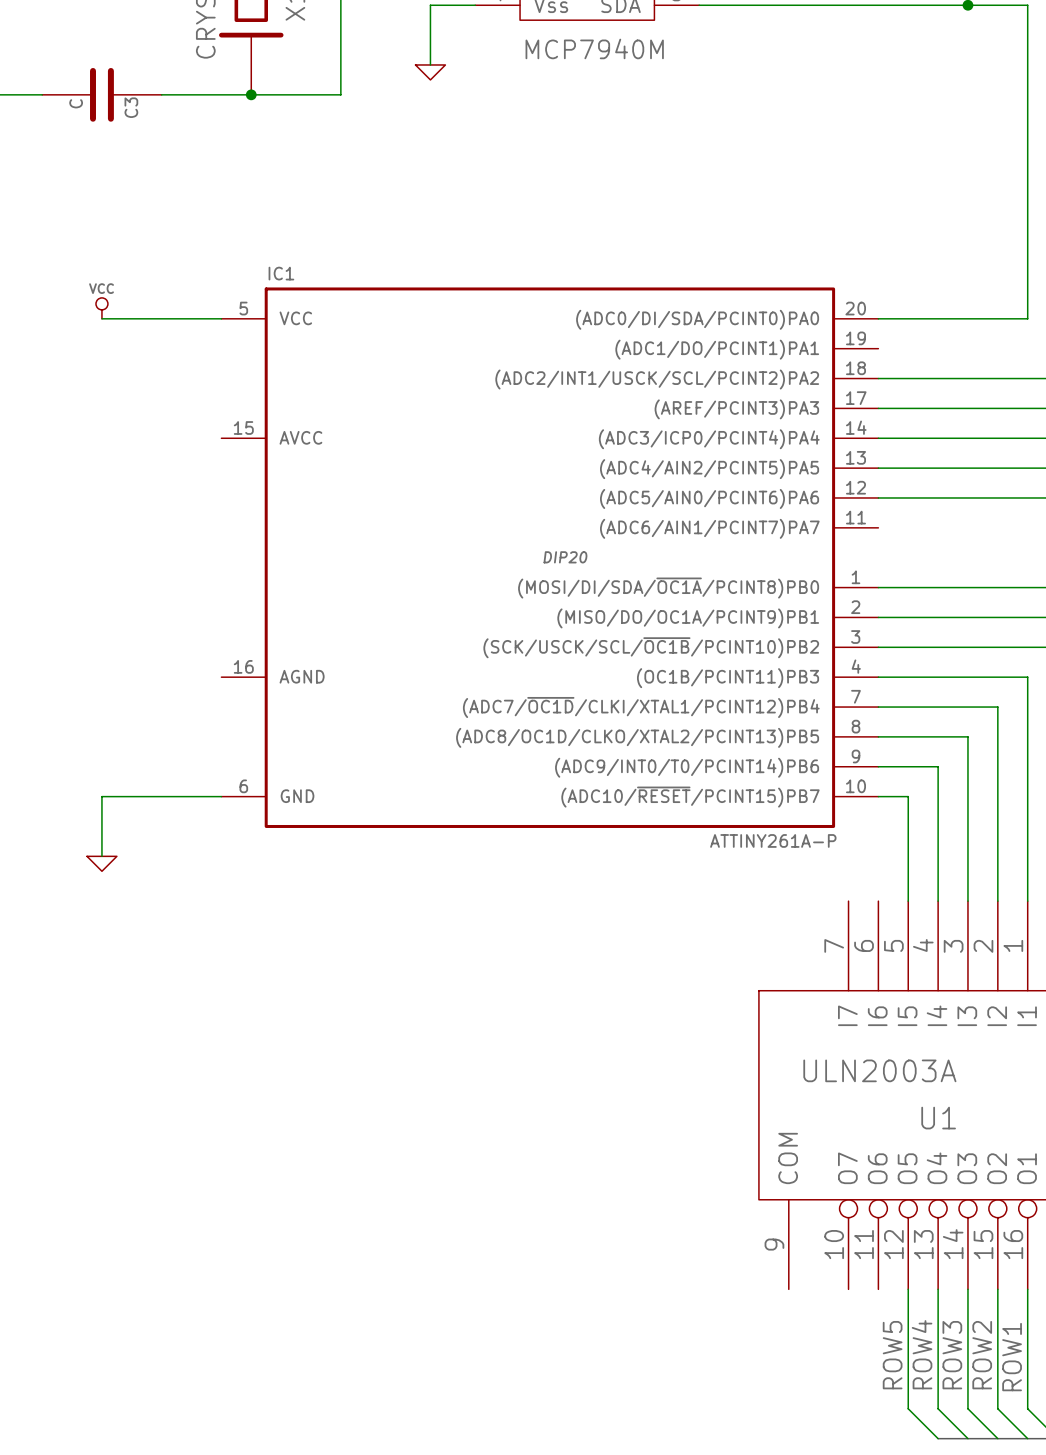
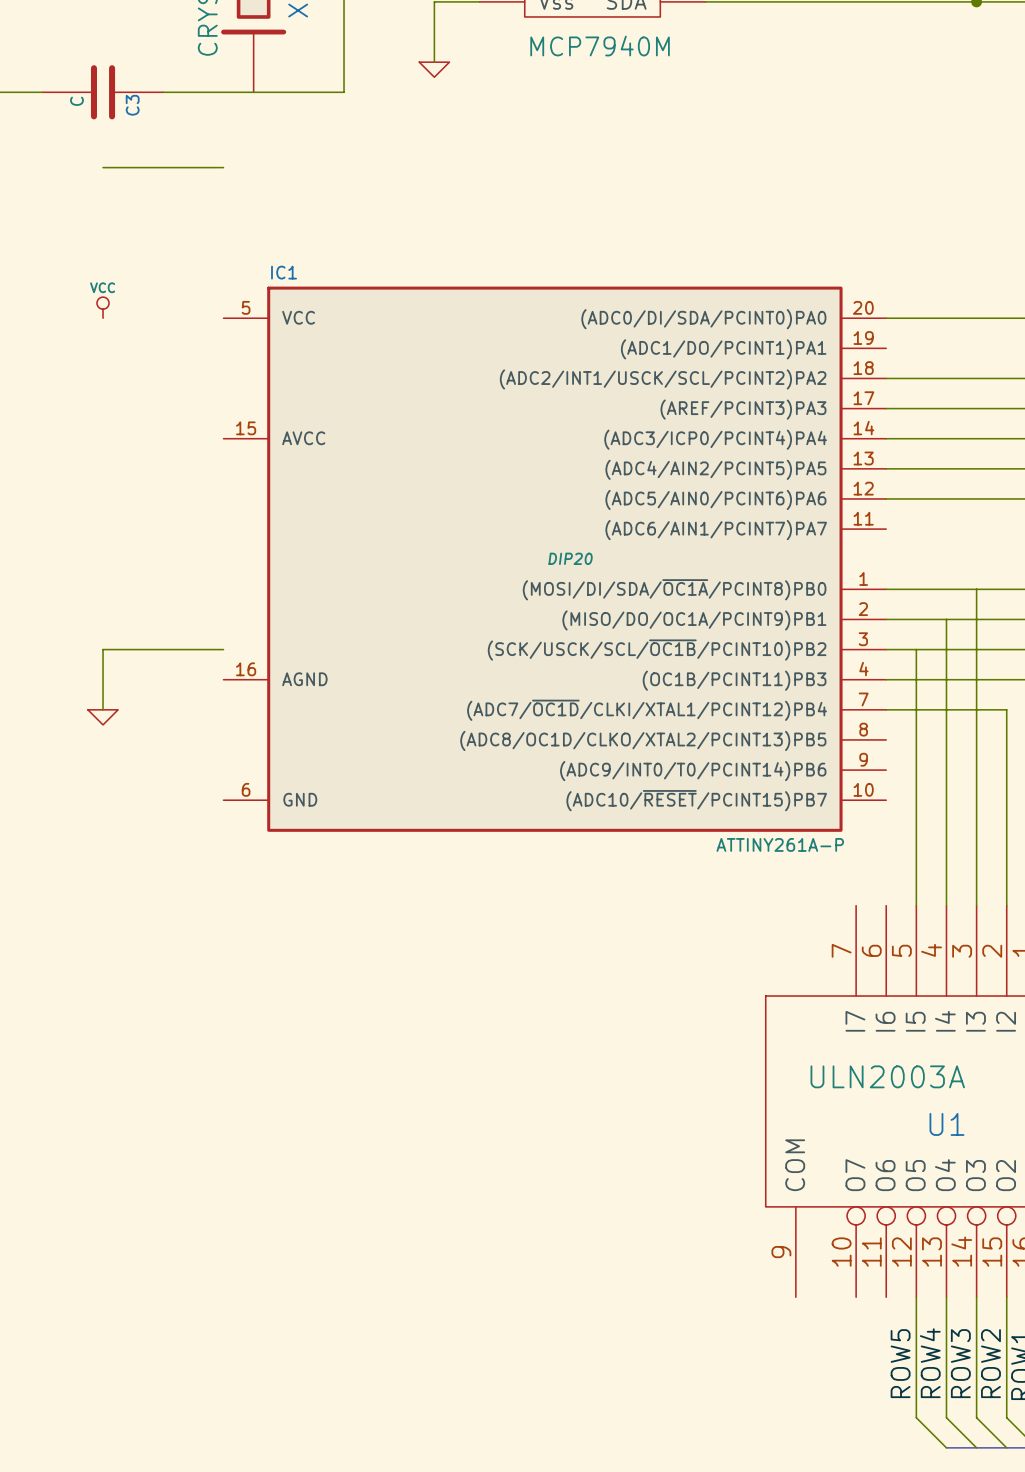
junction: (251, 94) -> none
wire: (101, 318) (221, 318) -> (103, 167) (223, 167)
wire: (878, 736) (967, 736) -> (976, 589) (976, 739)
wire: (878, 766) (938, 766) -> (946, 619) (946, 770)
wire: (221, 796) (101, 796) (101, 856) -> (223, 649) (103, 649) (103, 709)
wire: (878, 796) (908, 796) -> (916, 649) (916, 800)
power symbol position: (101, 863) -> (103, 717)

